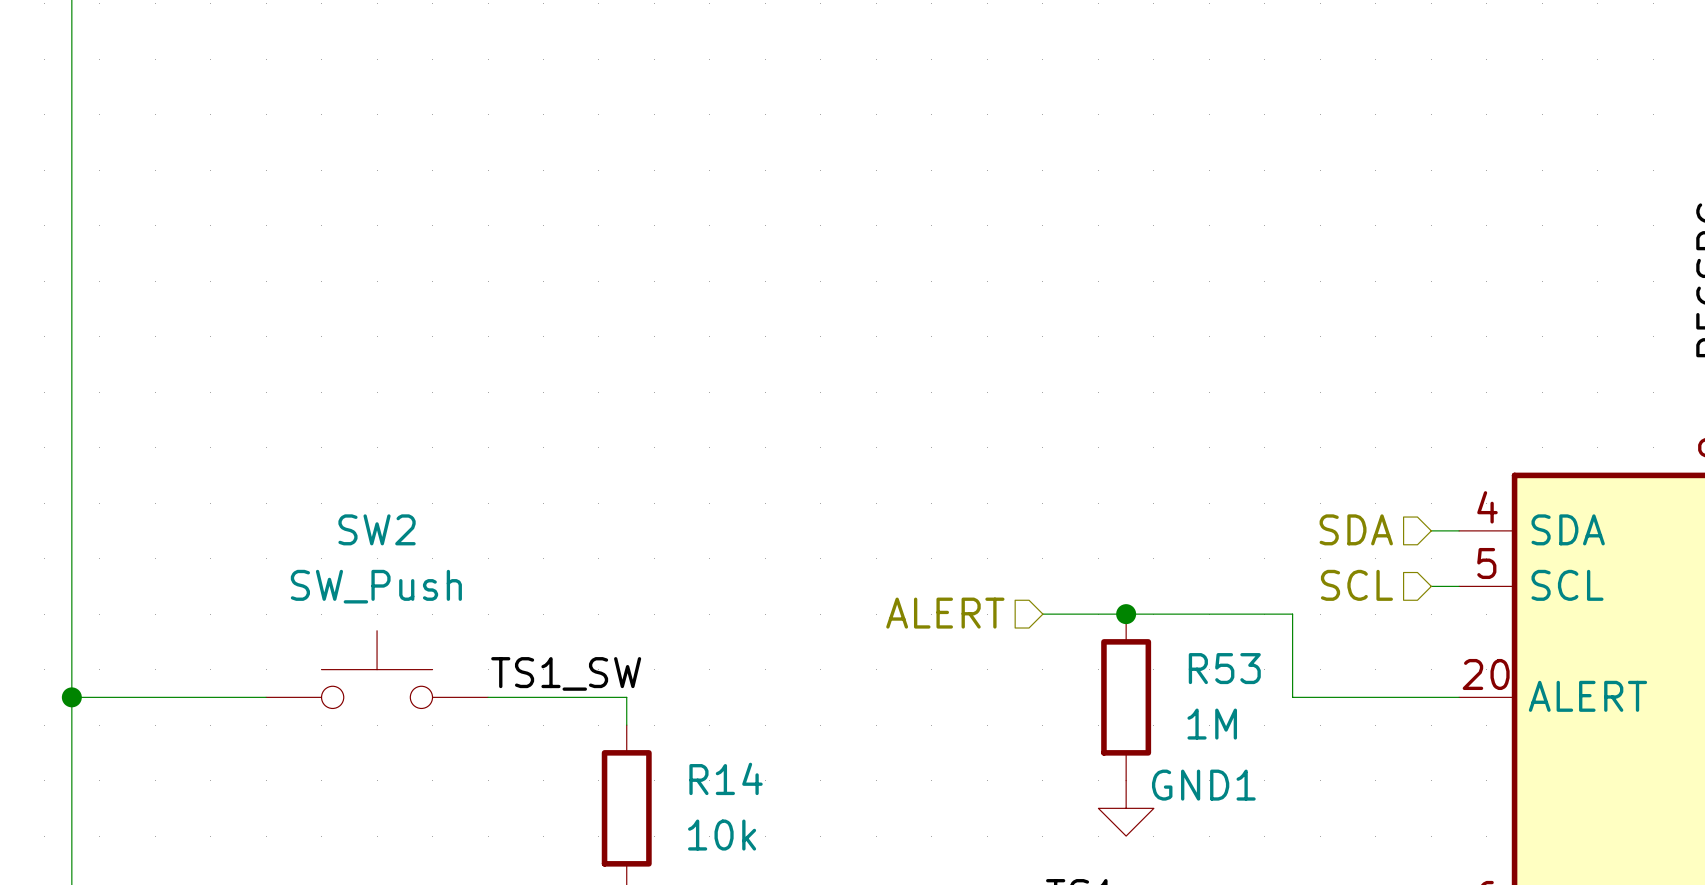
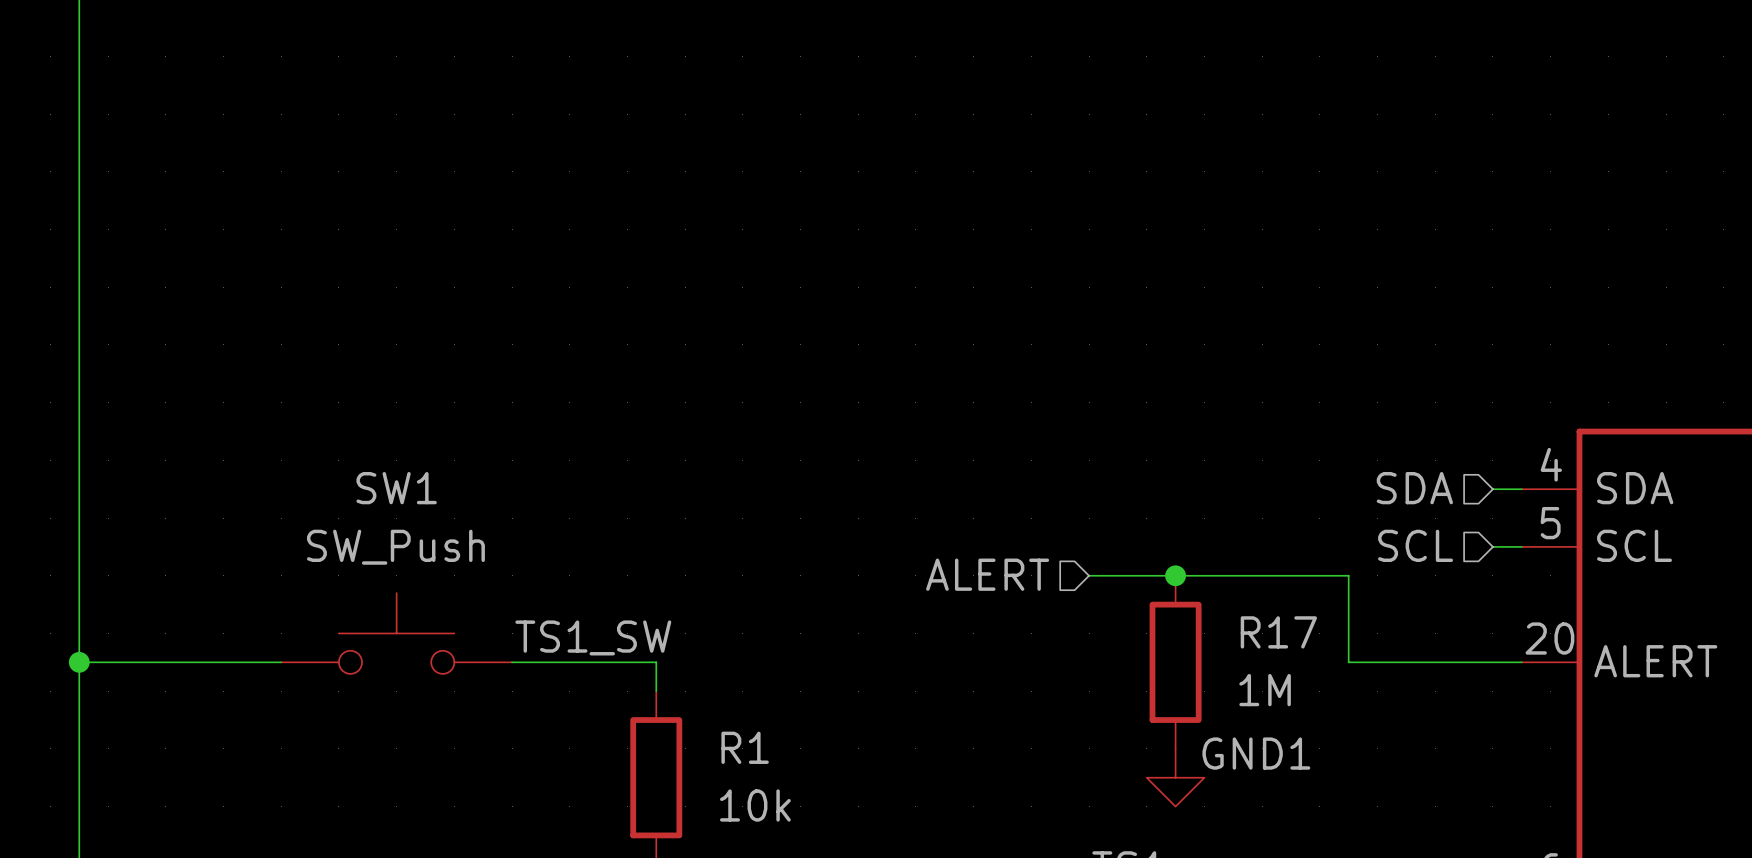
SW2 name: SW2 (377, 529) -> SW1 (396, 488)
R53 name: R53 (1224, 668) -> R17 (1278, 632)
R14 name: R14 (726, 778) -> R1 (745, 747)

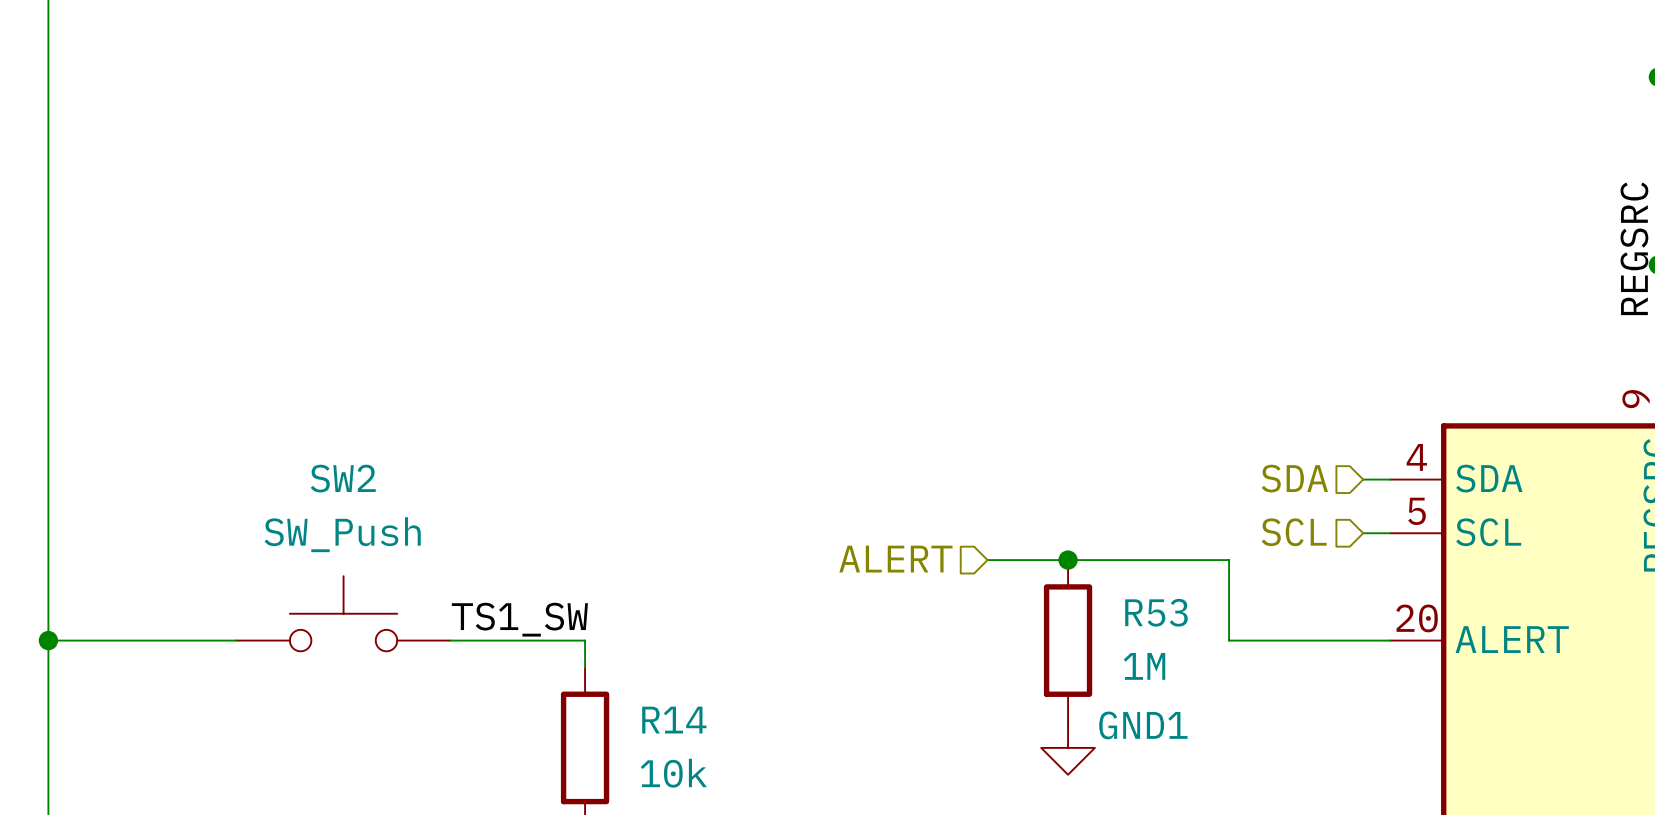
SW1 name: SW1 (396, 488) -> SW2 (343, 478)
R17 name: R17 (1278, 632) -> R53 (1156, 612)
R1 name: R1 (745, 747) -> R14 (674, 720)

